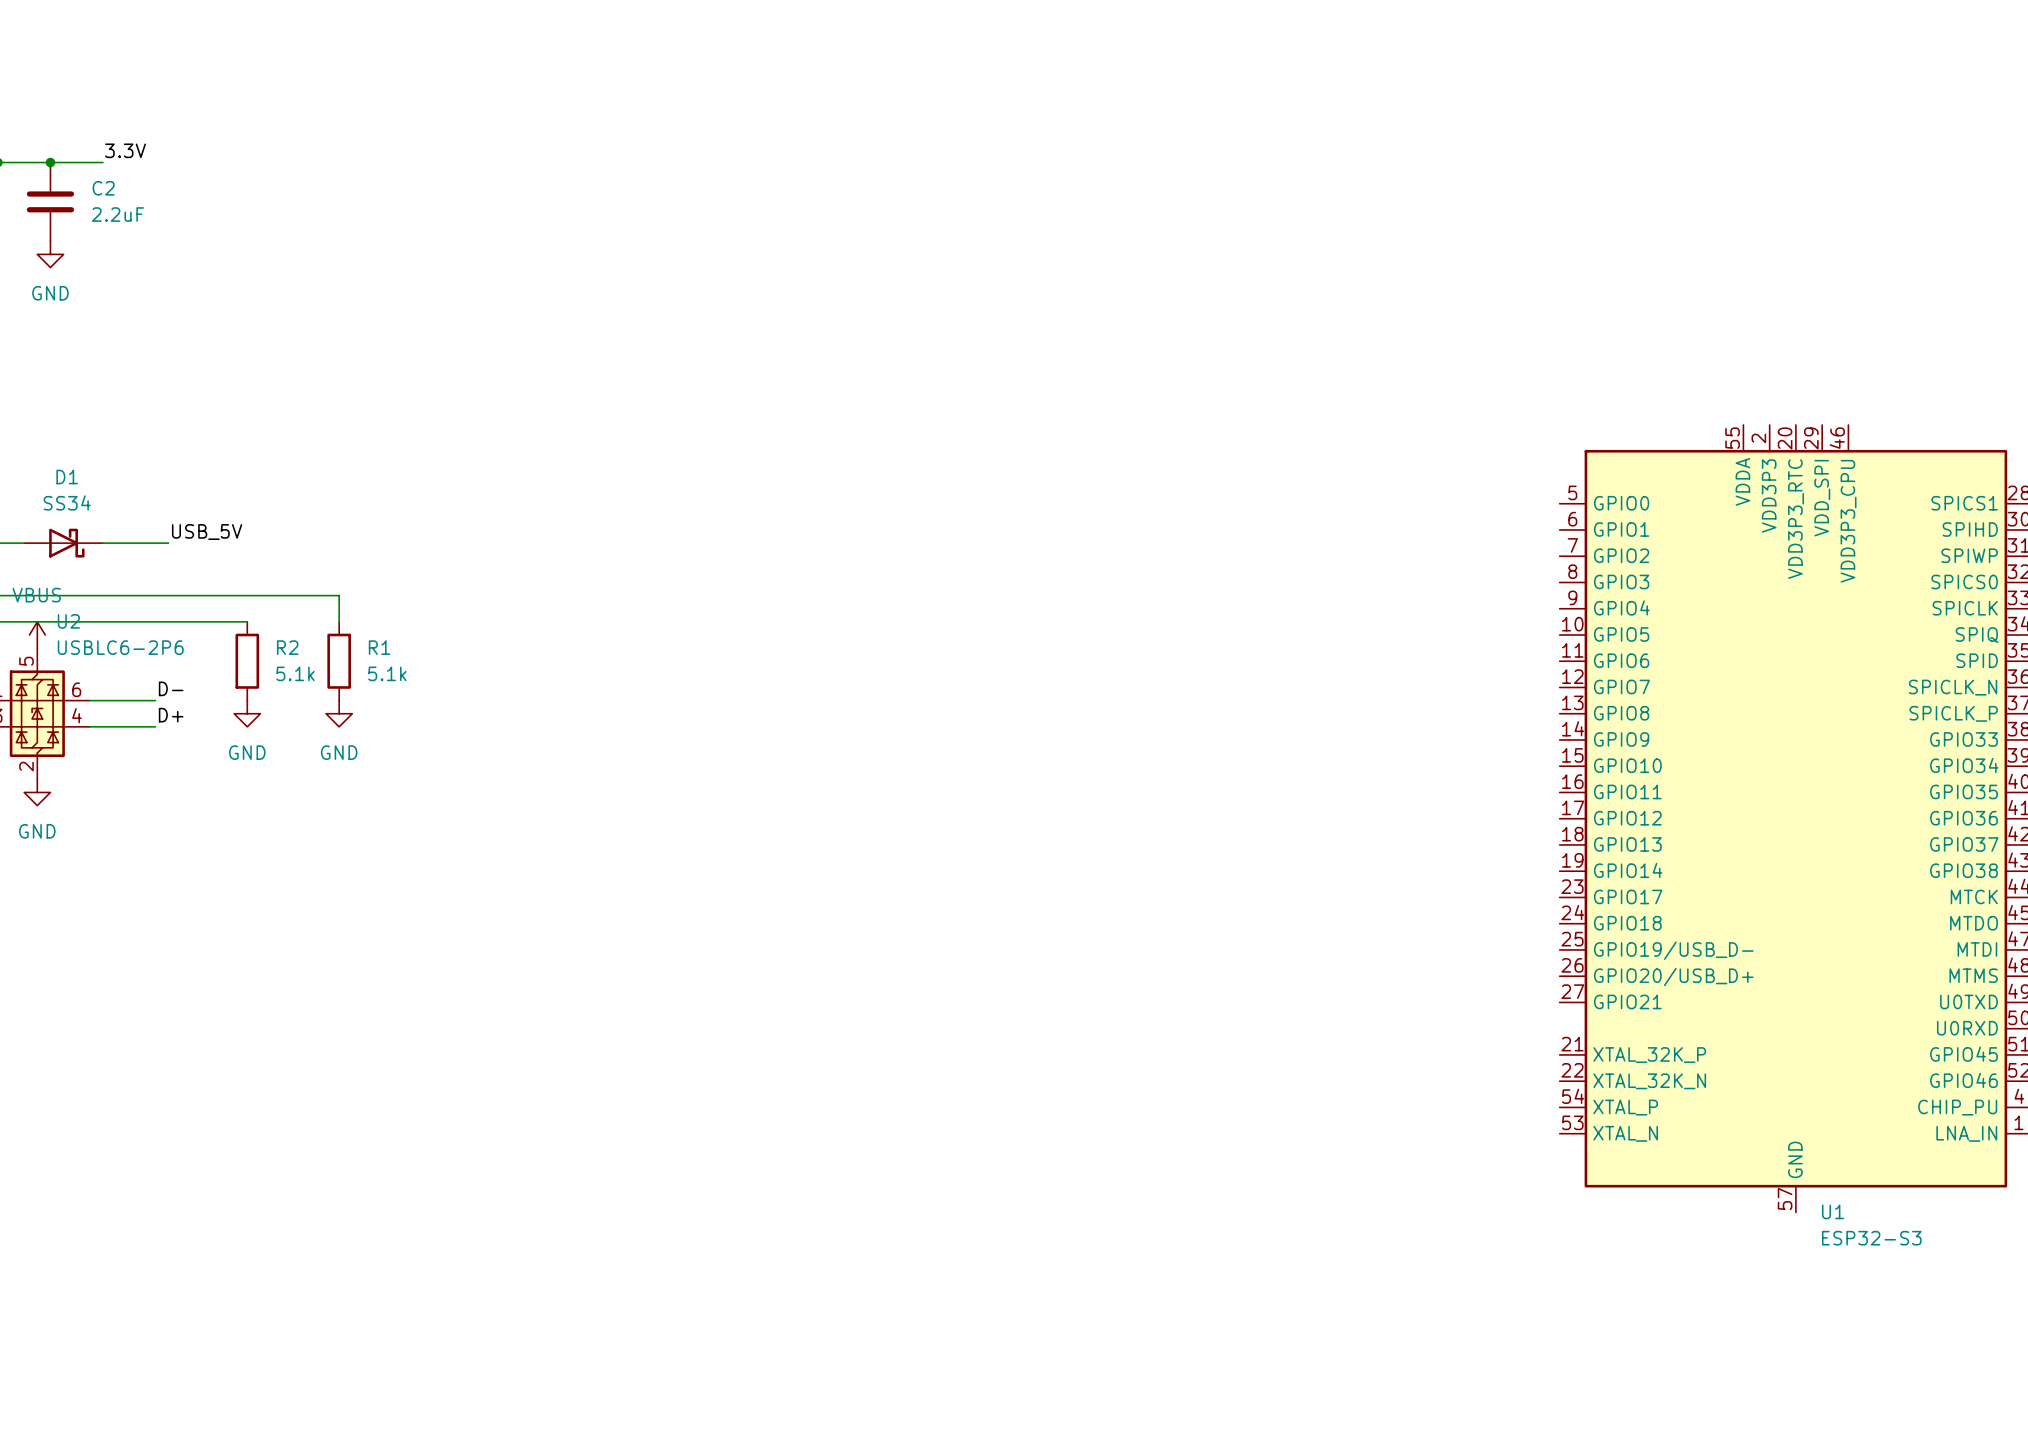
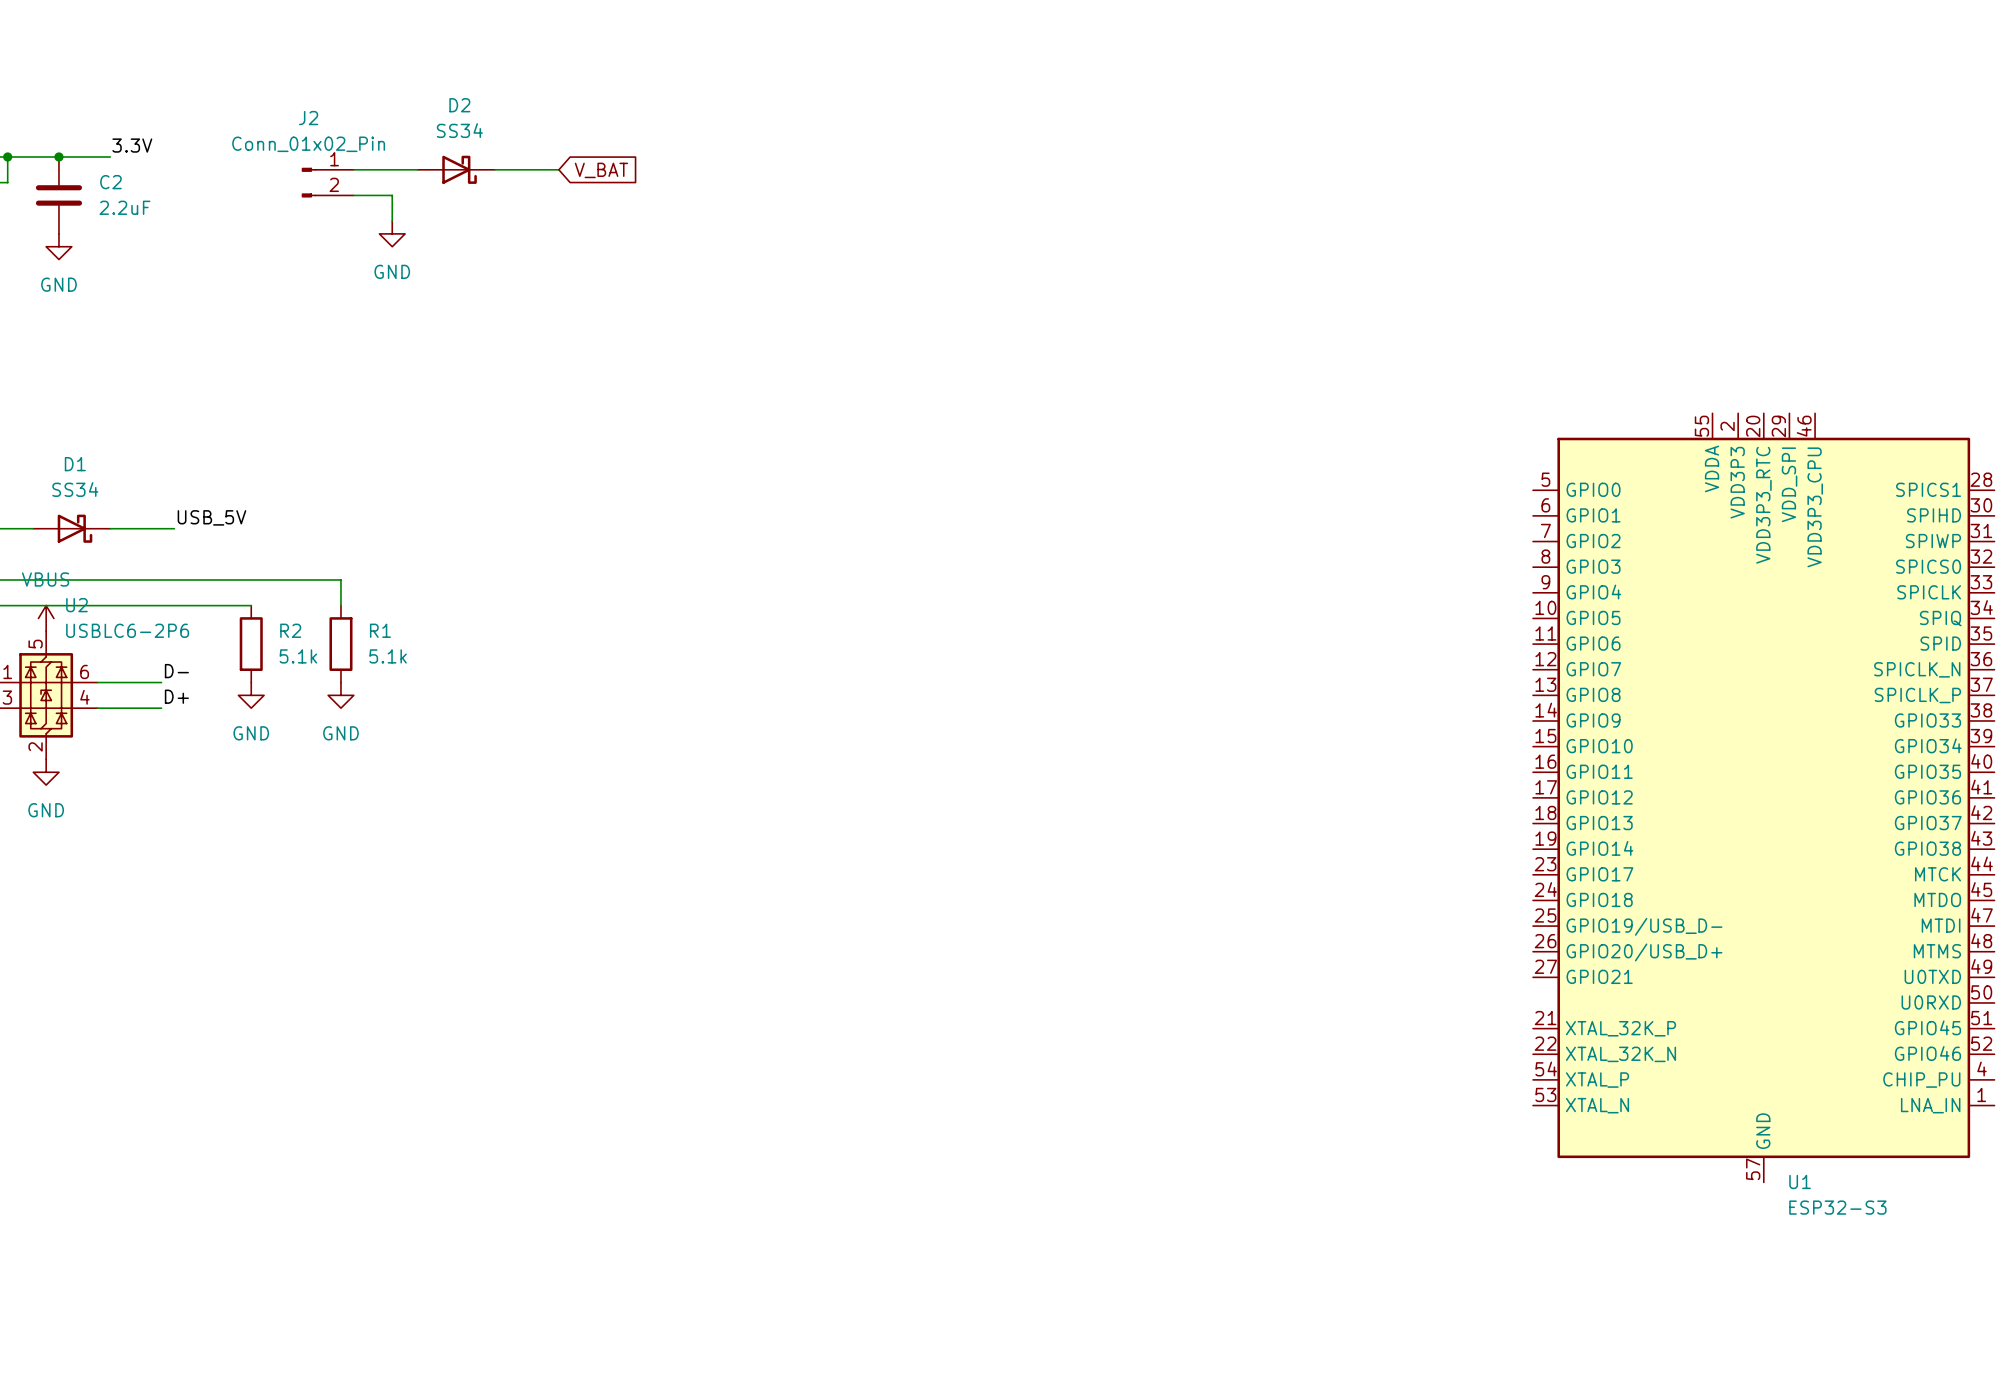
wire: none -> (353, 169) (417, 169)
D2: none -> SS34 (456, 169)
wire: none -> (494, 169) (558, 169)
global label: none -> V_BAT (601, 170)
J2: none -> Conn_01x02_Pin (327, 182)
wire: none -> (353, 195) (392, 195) (392, 221)
power symbol: none -> GND (392, 233)

